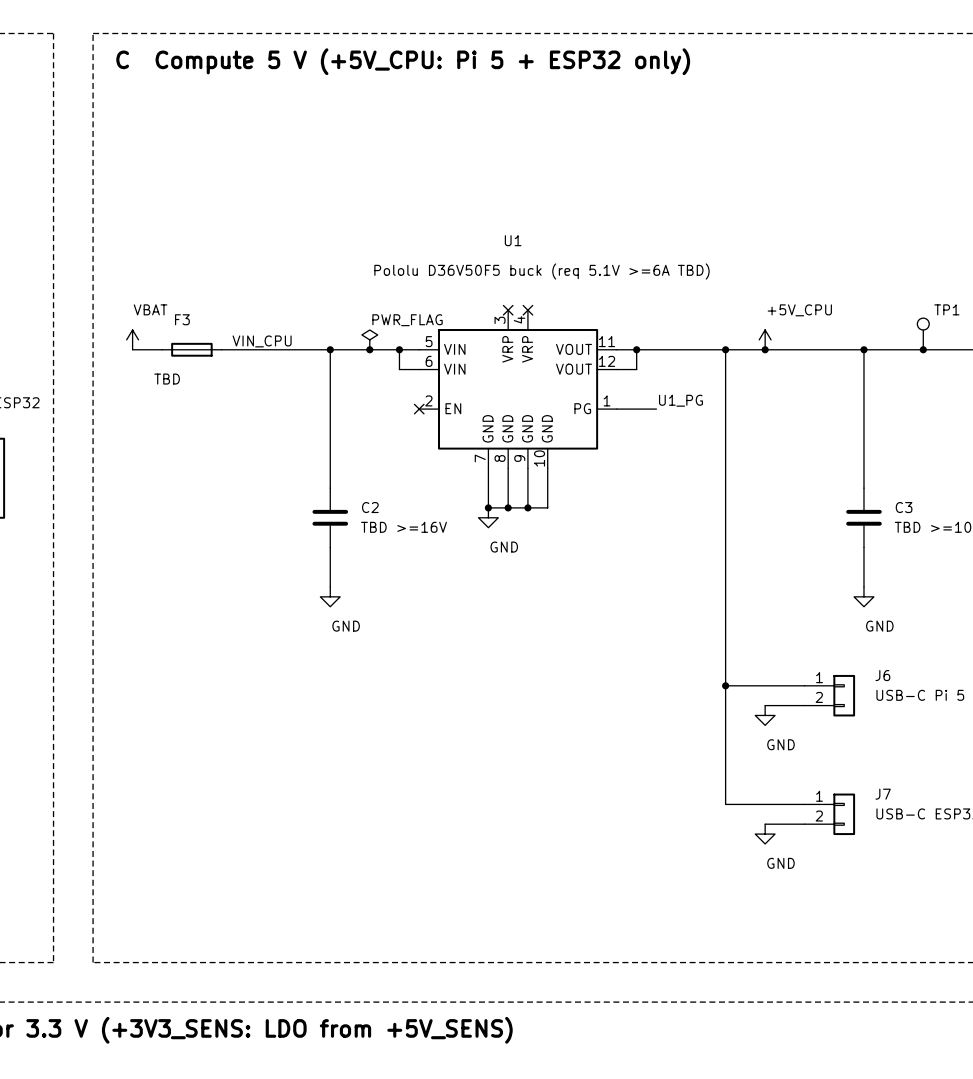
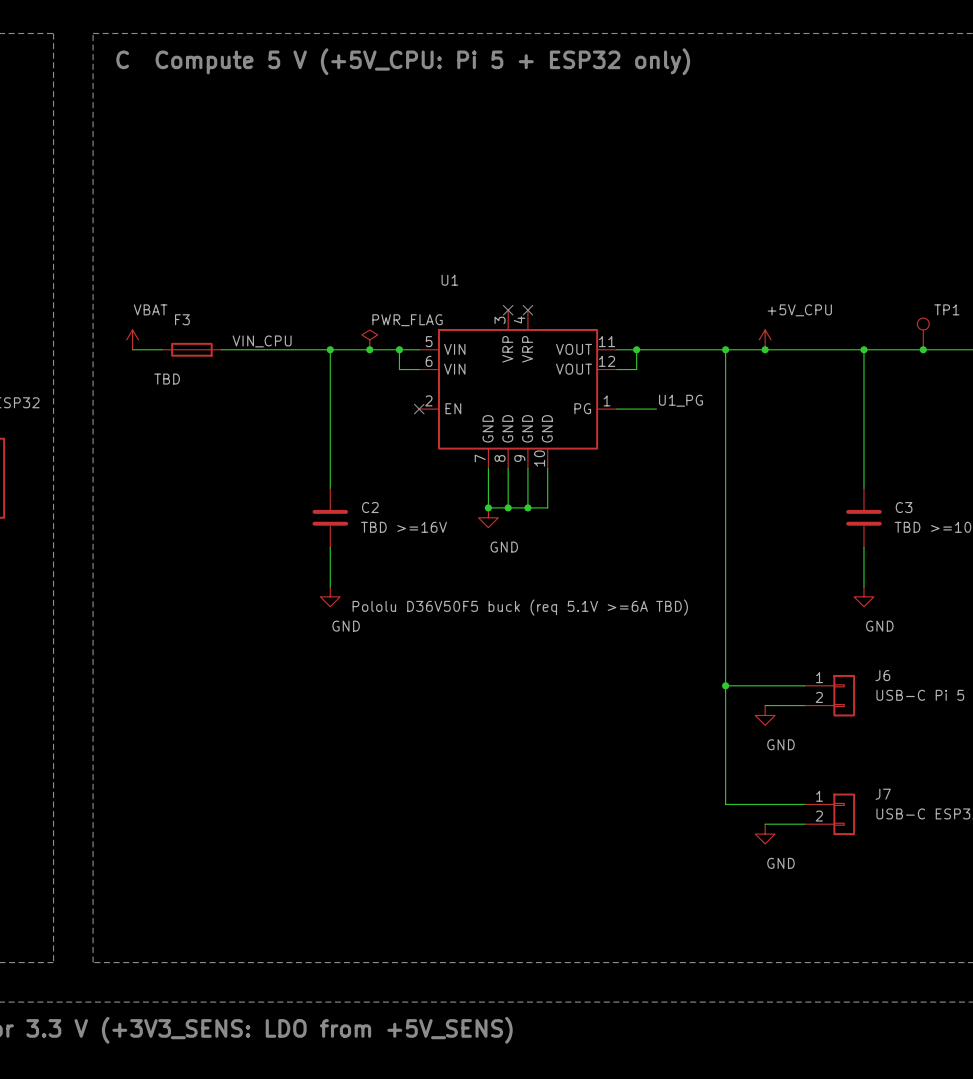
U1 name position: U1 (513, 240) -> U1 (449, 280)
U1 value position: Pololu D36V50F5 buck (req 5.1V >=6A TBD) (541, 271) -> Pololu D36V50F5 buck (req 5.1V >=6A TBD) (520, 607)

